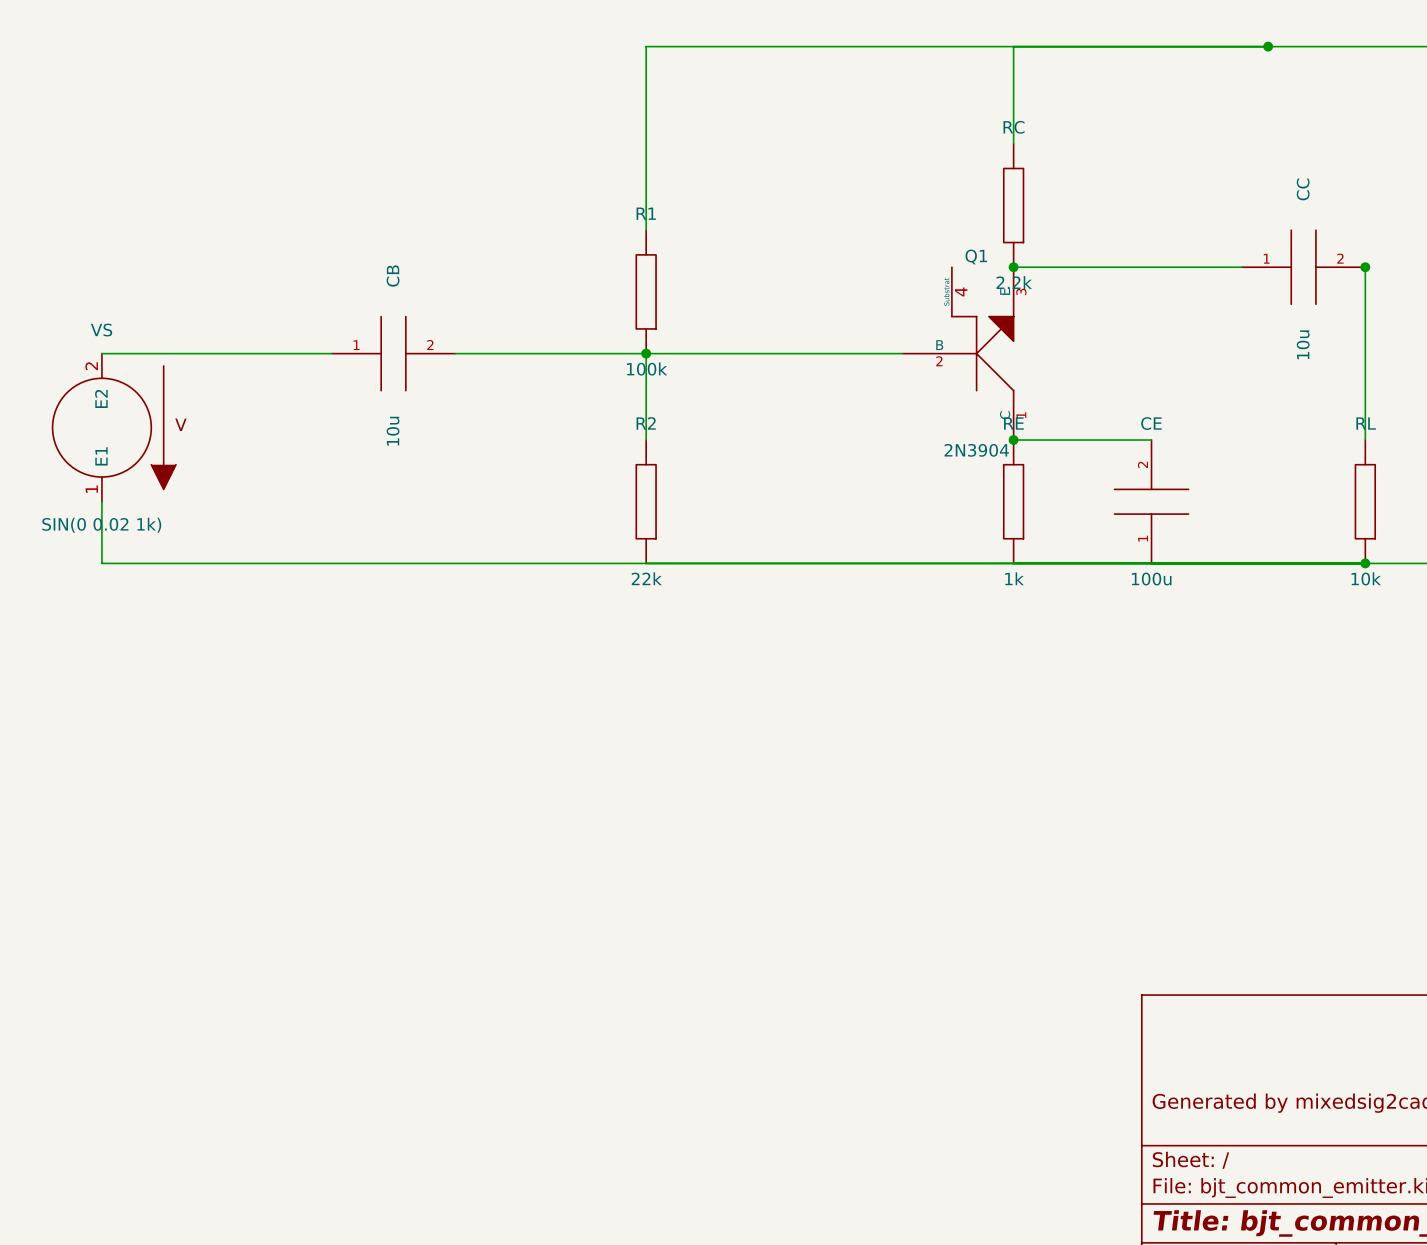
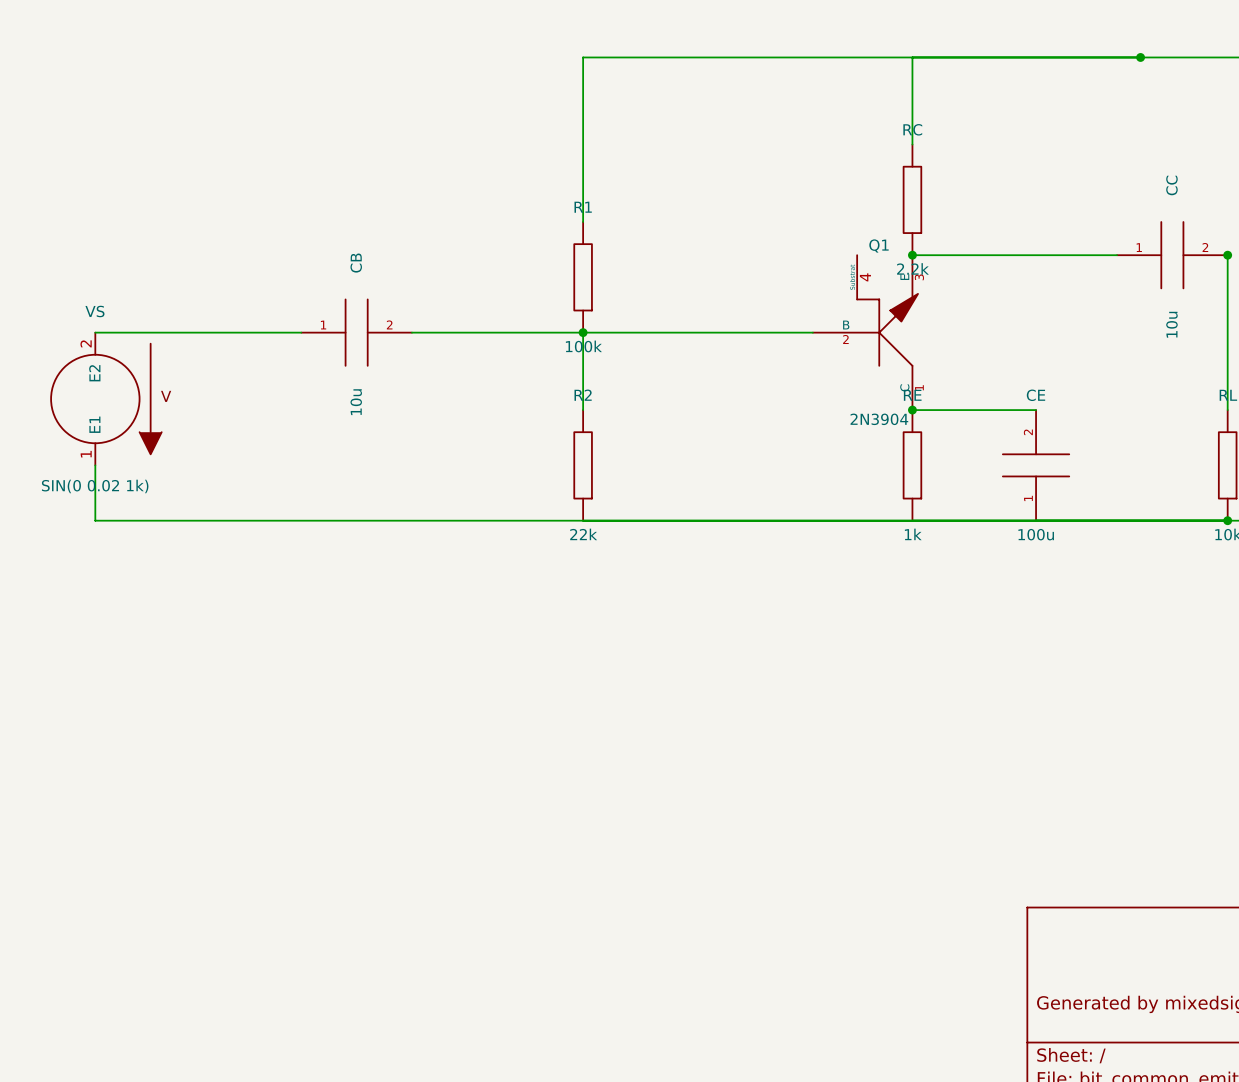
Q1 symbol: [902, 267, 1014, 441] -> [812, 255, 919, 411]

